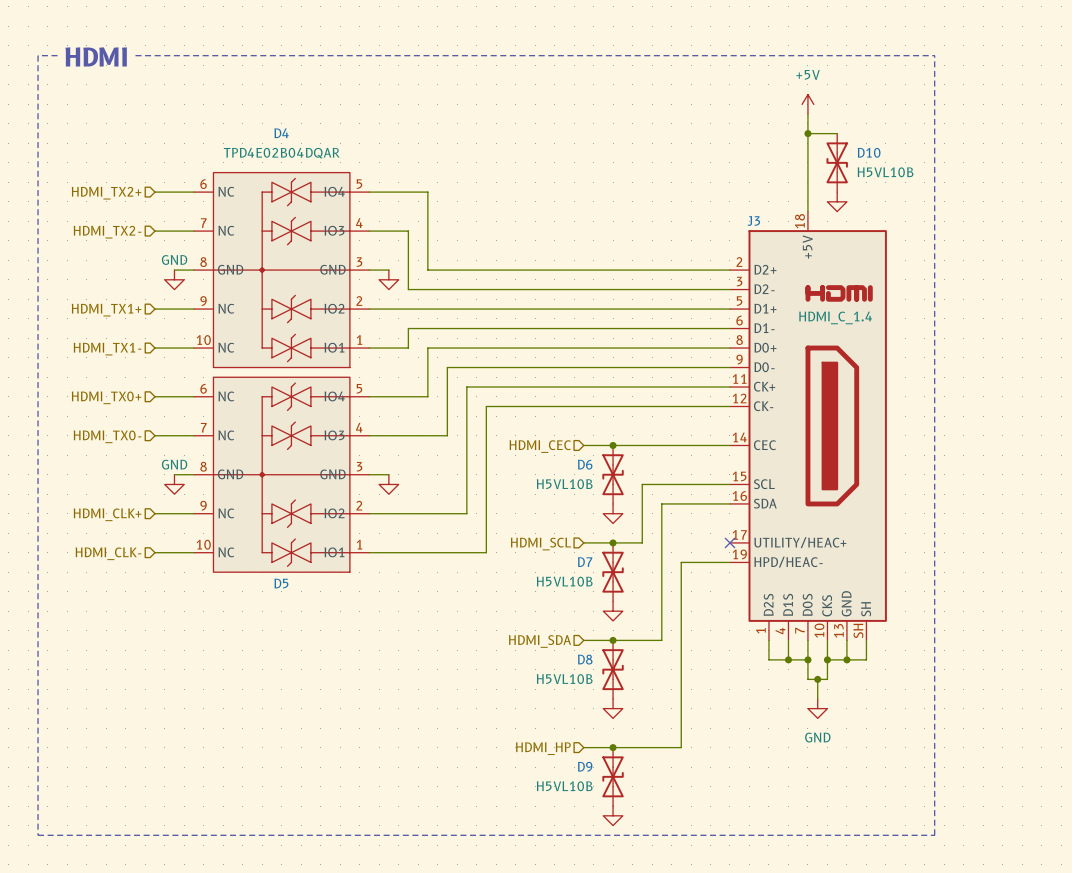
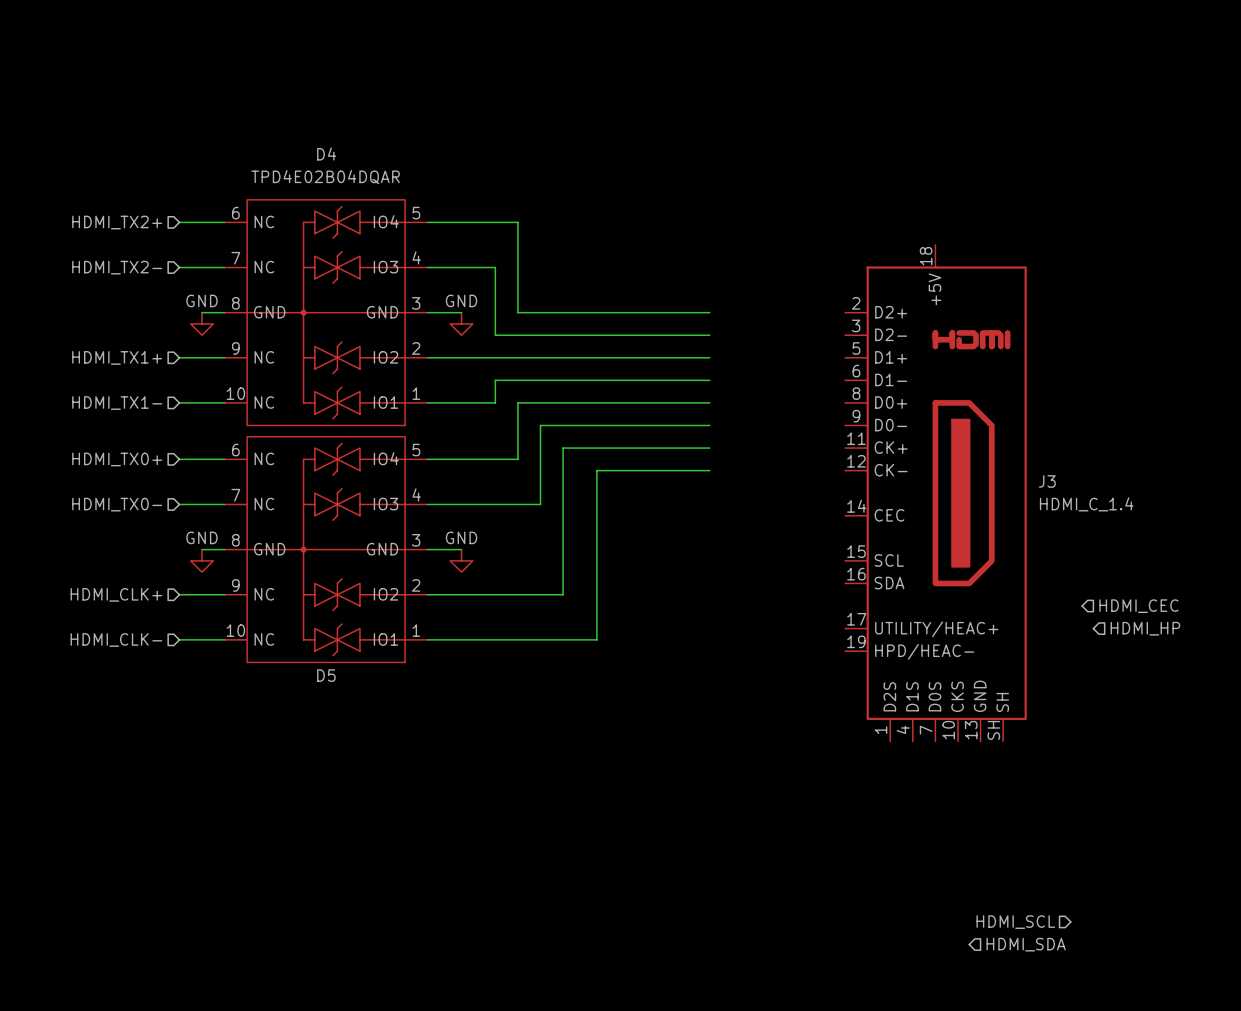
line: (57, 55) (38, 55) (38, 835) (934, 835) (934, 55) (135, 55) -> none
text: HDMI (96, 56) -> none
power symbol: +5V (807, 104) -> none
wire: (807, 114) (807, 211) -> none
wire: (807, 133) (837, 133) -> none
junction: (807, 133) -> none
D10: H5VL10B (837, 162) -> none
wire: (427, 192) (427, 231) -> (472, 267) (495, 267)
wire: none -> (495, 222) (517, 222) (517, 312)
power symbol: (837, 201) -> none
J3 name position: J3 (753, 221) -> J3 (1047, 481)
wire: (408, 231) (408, 289) (427, 289) -> none
wire: none -> (450, 312) (461, 312)
wire: (427, 270) (447, 270) -> (495, 312) (495, 335)
wire: (613, 270) (729, 270) -> none
power symbol: (388, 279) -> none
power symbol: none -> GND (461, 323)
wire: (613, 289) (729, 289) -> none
wire: (613, 309) (729, 309) -> none
J3 value position: HDMI_C_1.4 (835, 317) -> HDMI_C_1.4 (1086, 504)
wire: (427, 328) (408, 328) (408, 348) -> (495, 380) (495, 402) (472, 402)
wire: (613, 328) (729, 328) -> none
wire: (447, 348) (427, 348) (427, 396) -> (517, 402) (517, 425)
wire: (613, 348) (729, 348) -> none
wire: (447, 367) (466, 367) -> (540, 448) (540, 425)
wire: (613, 367) (729, 367) -> none
wire: (466, 387) (486, 387) -> (563, 470) (563, 448)
wire: (613, 387) (729, 387) -> none
wire: none -> (495, 459) (517, 459)
wire: (447, 396) (447, 435) -> (540, 504) (517, 504)
wire: (486, 406) (515, 406) -> (563, 639) (596, 639) (596, 470)
wire: (613, 406) (729, 406) -> none
wire: (466, 435) (466, 513) -> none
wire: (583, 445) (729, 445) -> none
junction: (613, 445) -> none
hierarchical label: HDMI_CEC (540, 446) -> none
wire: none -> (450, 549) (461, 549)
D6: H5VL10B (613, 474) -> none
power symbol: (388, 484) -> none
power symbol: none -> GND (461, 560)
wire: (729, 484) (642, 484) (642, 542) (583, 542) -> none
wire: (729, 503) (661, 503) (661, 640) (583, 640) -> none
wire: (486, 513) (486, 552) -> (563, 594) (540, 594)
power symbol: (613, 513) -> none
hierarchical label: none -> HDMI_CEC (1138, 606)
junction: (613, 542) -> none
no-connect mark: (729, 542) -> none
hierarchical label: HDMI_SCL (540, 544) -> none
hierarchical label: none -> HDMI_HP (1145, 628)
wire: (729, 562) (681, 562) (681, 747) (583, 747) -> none
D7: H5VL10B (613, 572) -> none
power symbol: (613, 611) -> none
junction: (613, 640) -> none
wire: (768, 640) (768, 659) (807, 659) -> none
wire: (788, 640) (788, 659) -> none
wire: (807, 640) (807, 679) (827, 679) (827, 640) -> none
wire: (846, 640) (846, 659) -> none
wire: (866, 640) (866, 659) (827, 659) -> none
hierarchical label: HDMI_SDA (539, 641) -> none
junction: (788, 659) -> none
junction: (807, 659) -> none
junction: (827, 659) -> none
junction: (846, 659) -> none
D8: H5VL10B (613, 669) -> none
wire: (817, 679) (817, 698) -> none
junction: (817, 679) -> none
power symbol: (613, 708) -> none
power symbol: GND (817, 708) -> none
junction: (613, 747) -> none
hierarchical label: HDMI_HP (543, 748) -> none
D9: H5VL10B (613, 776) -> none
hierarchical label: none -> HDMI_SCL (1015, 922)
power symbol: (613, 815) -> none
hierarchical label: none -> HDMI_SDA (1026, 944)

